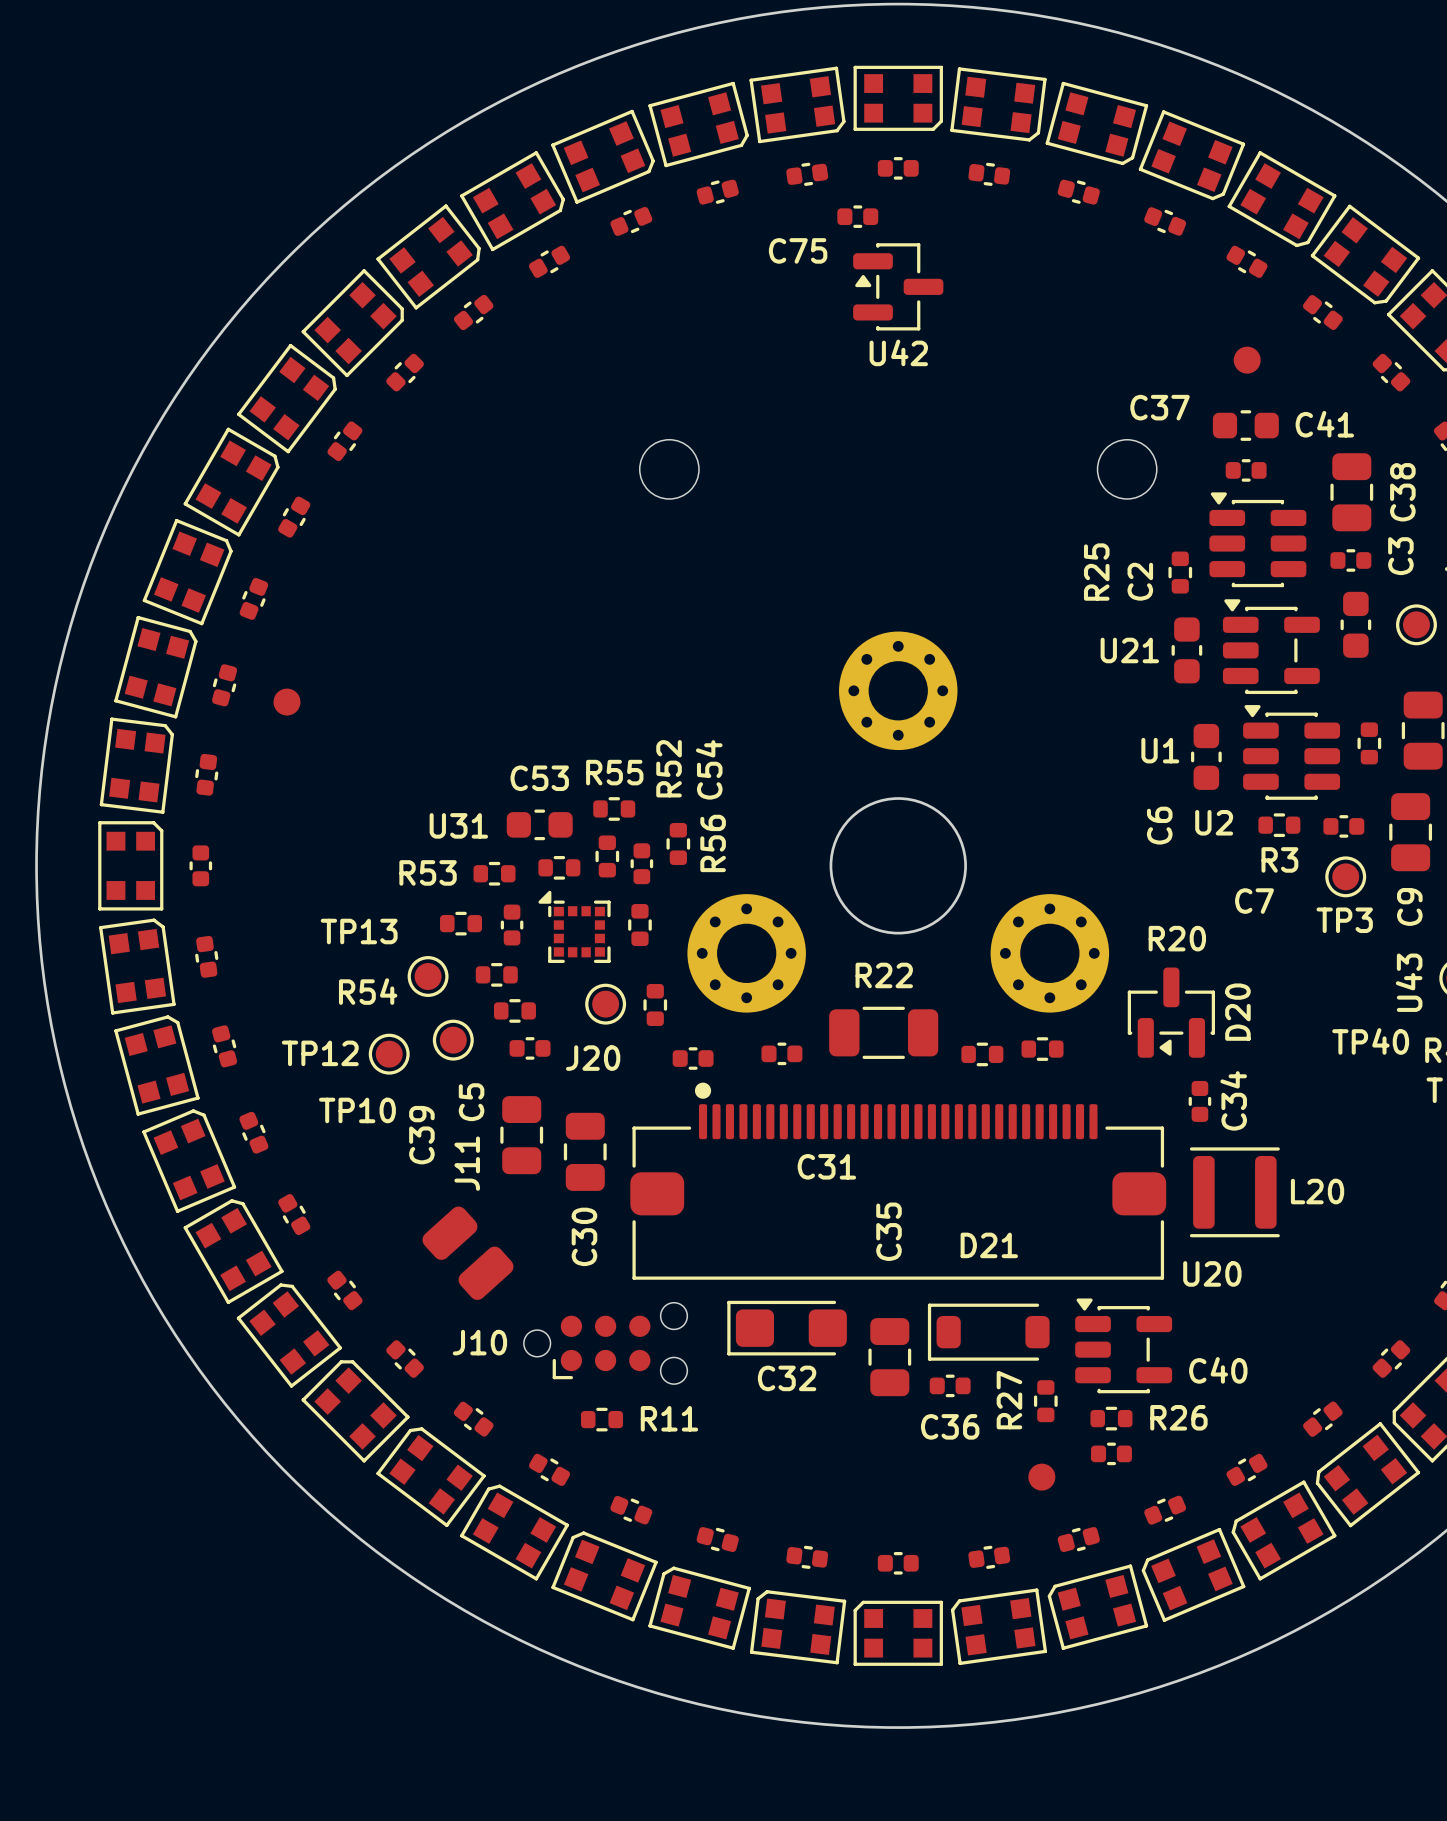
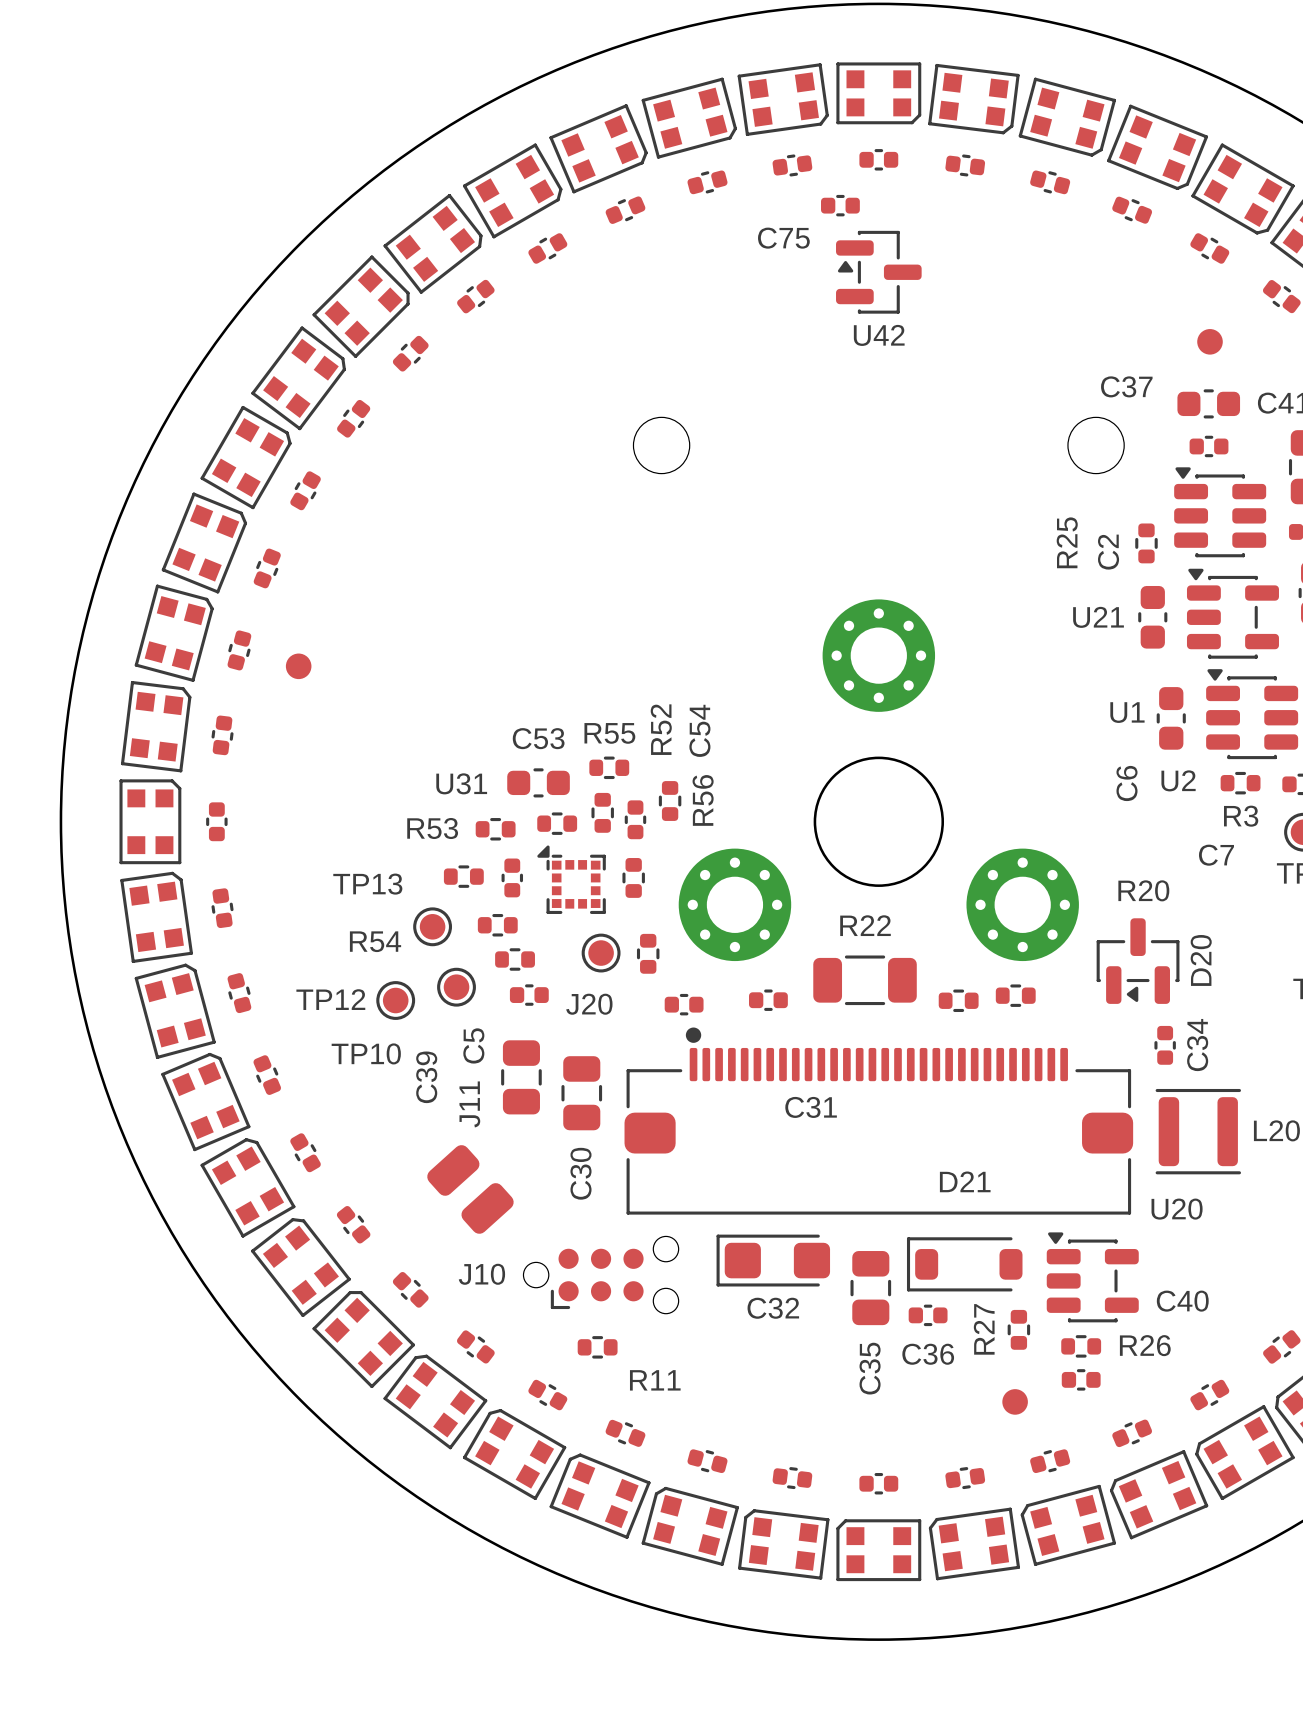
C35 name position: C35 (889, 1231) -> C35 (870, 1368)
R11 name position: R11 (669, 1418) -> R11 (655, 1380)

